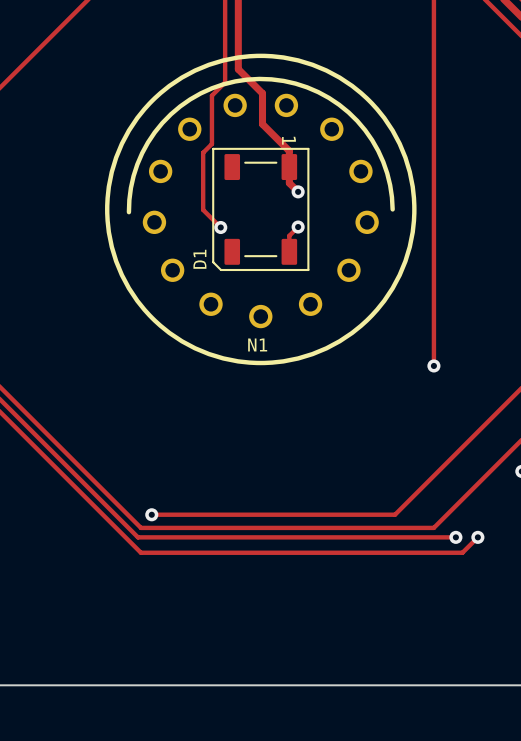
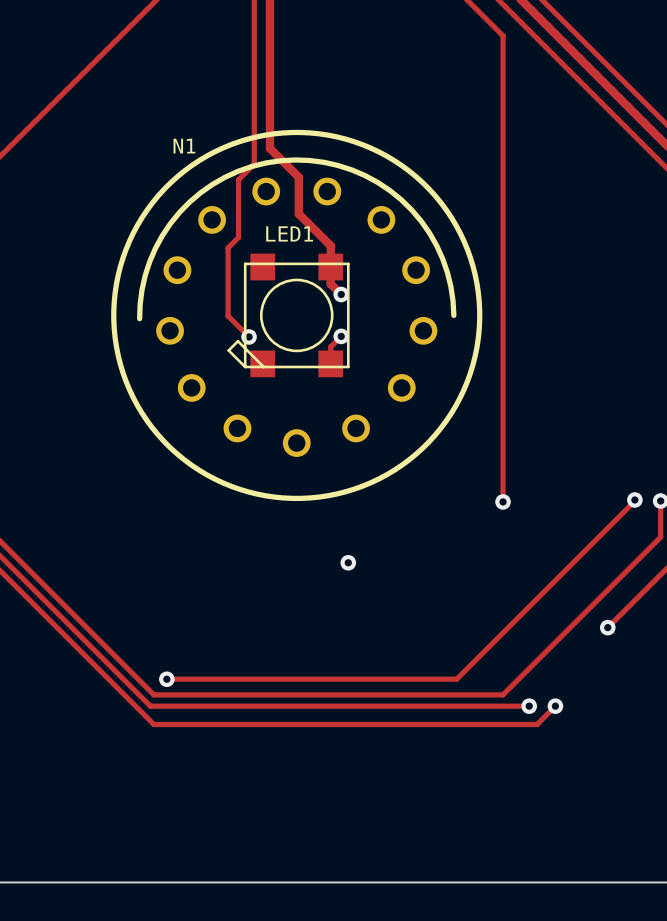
LED1: none -> (288, 315)
D1: (260, 209) -> none
N1 name position: N1 (257, 344) -> N1 (184, 146)
via: none -> (348, 562)

